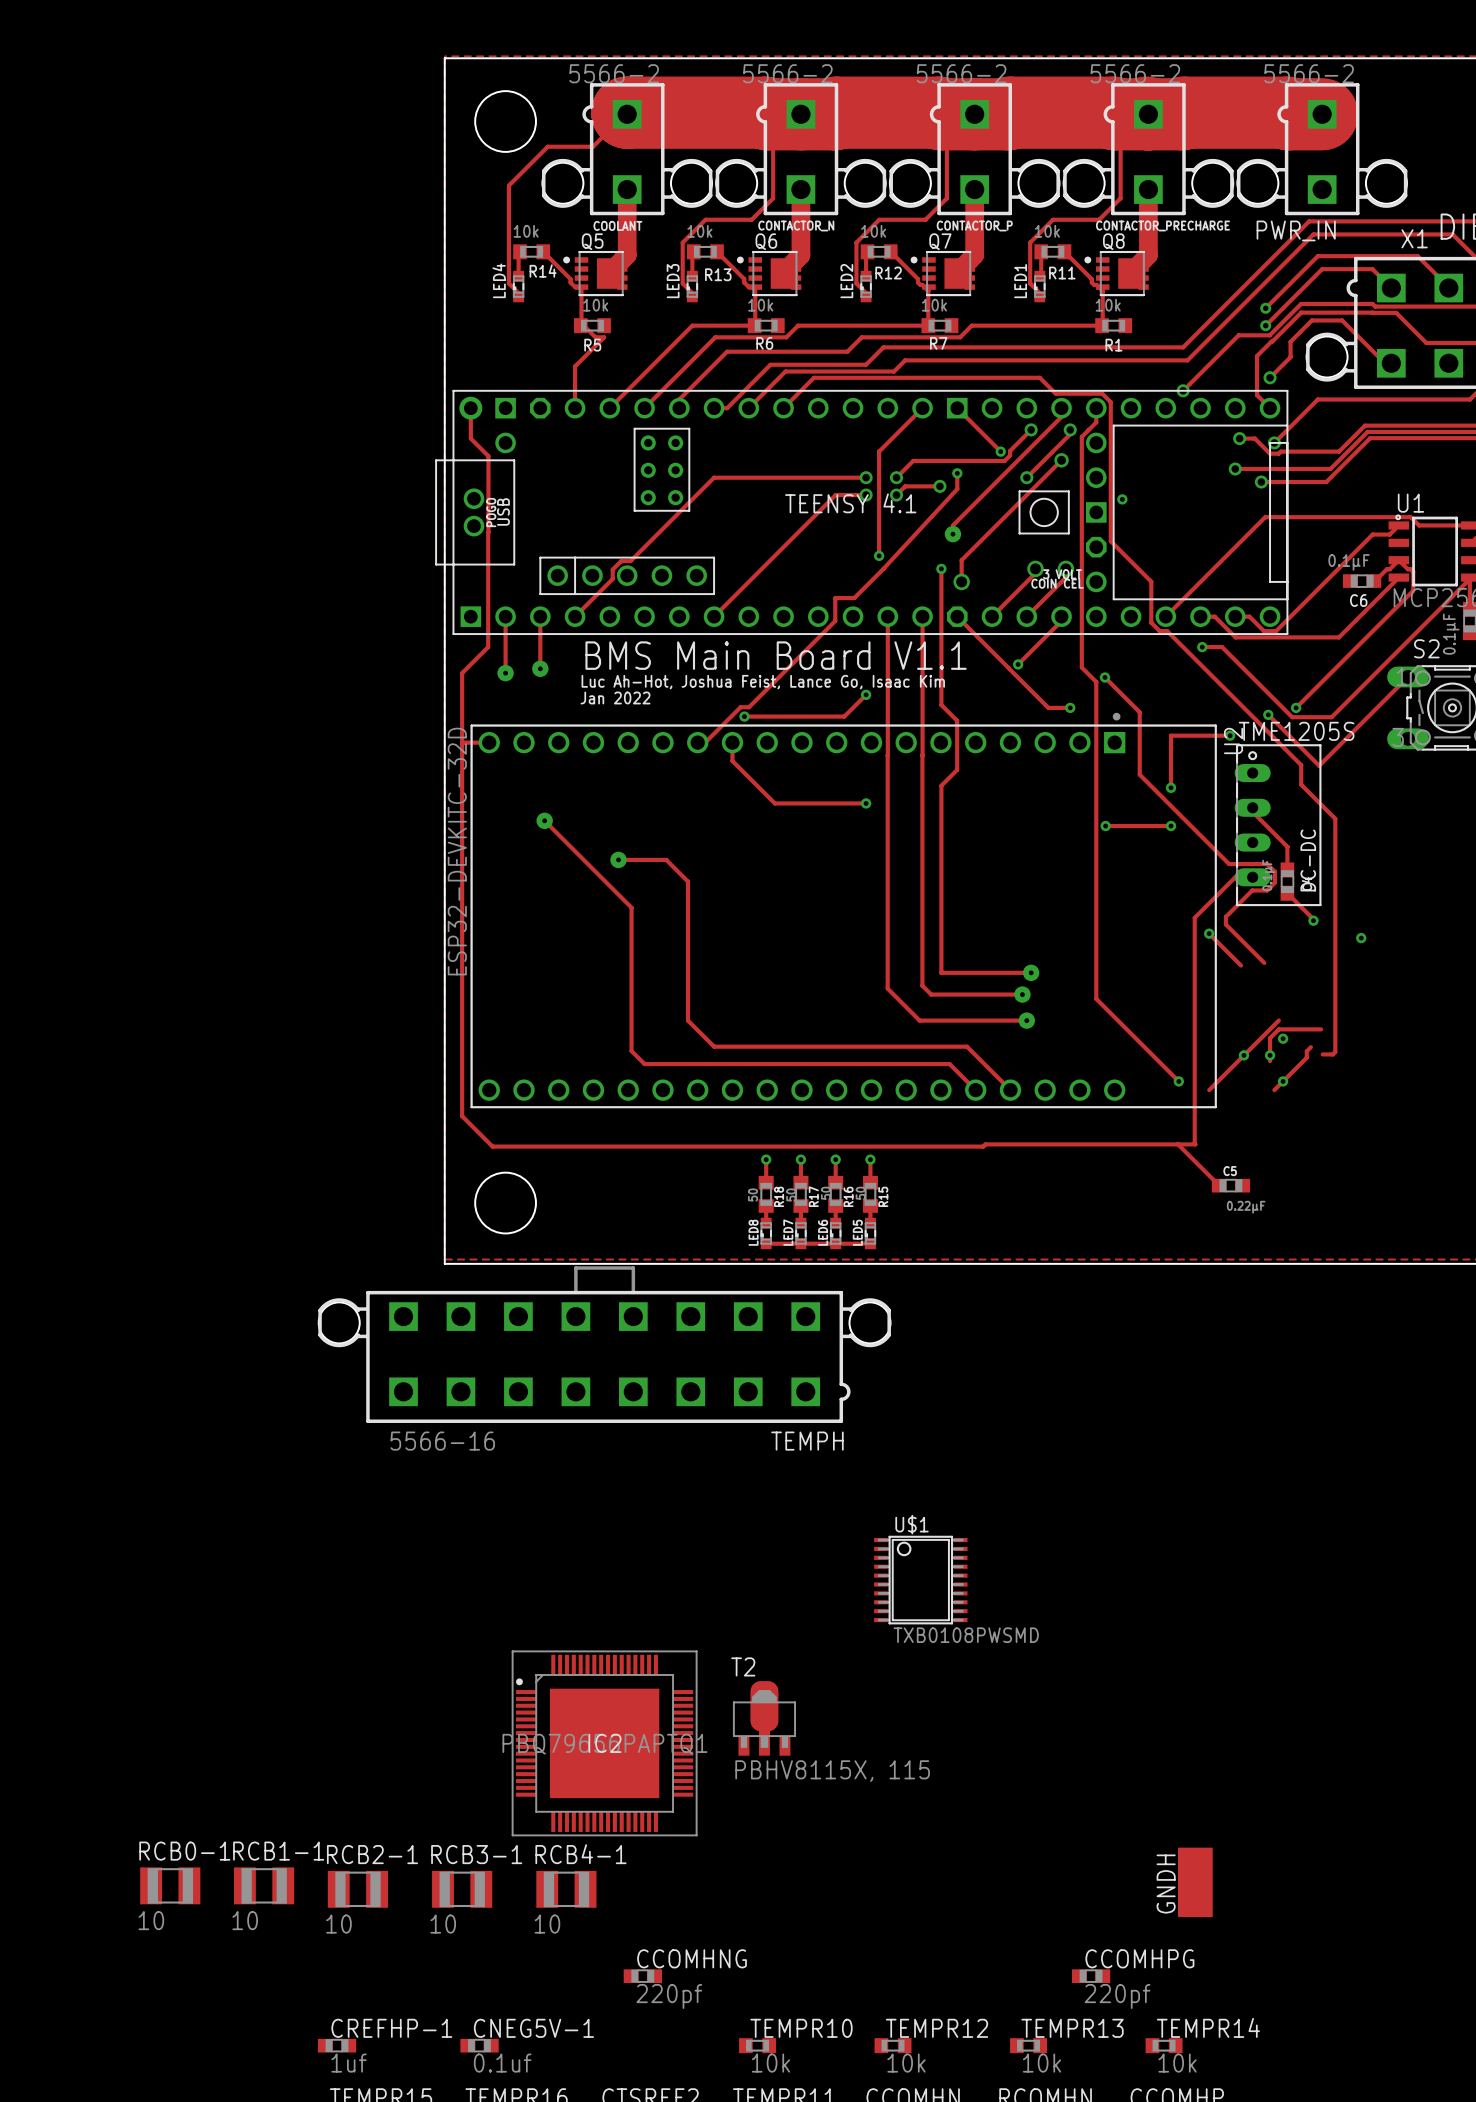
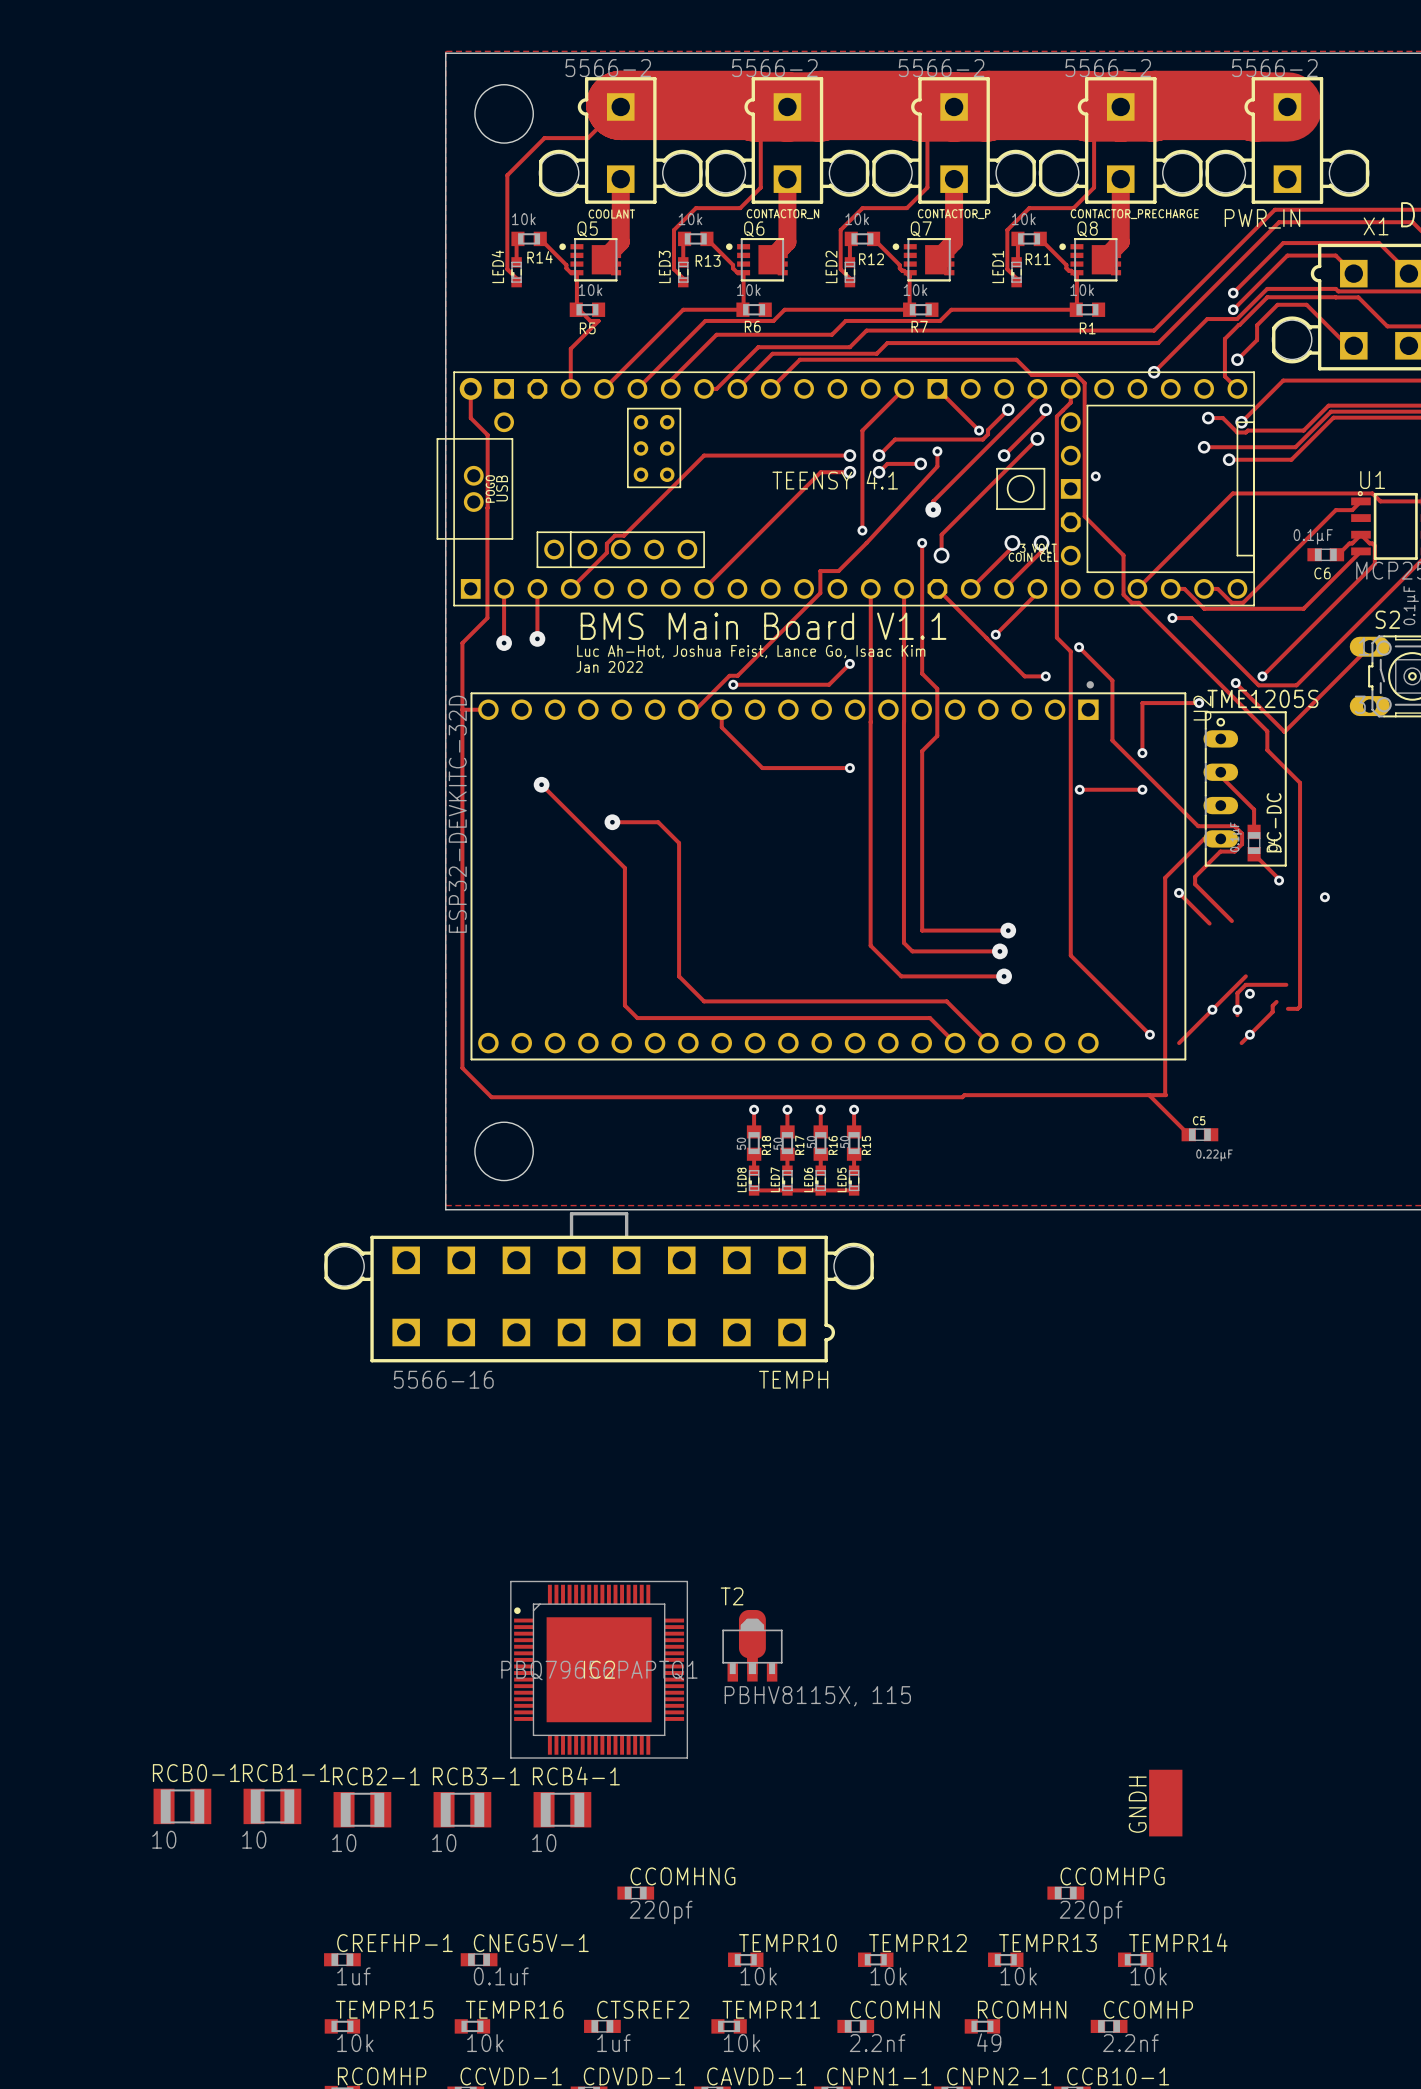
U$1: TXB0108PWSMD (920, 1580) -> none

